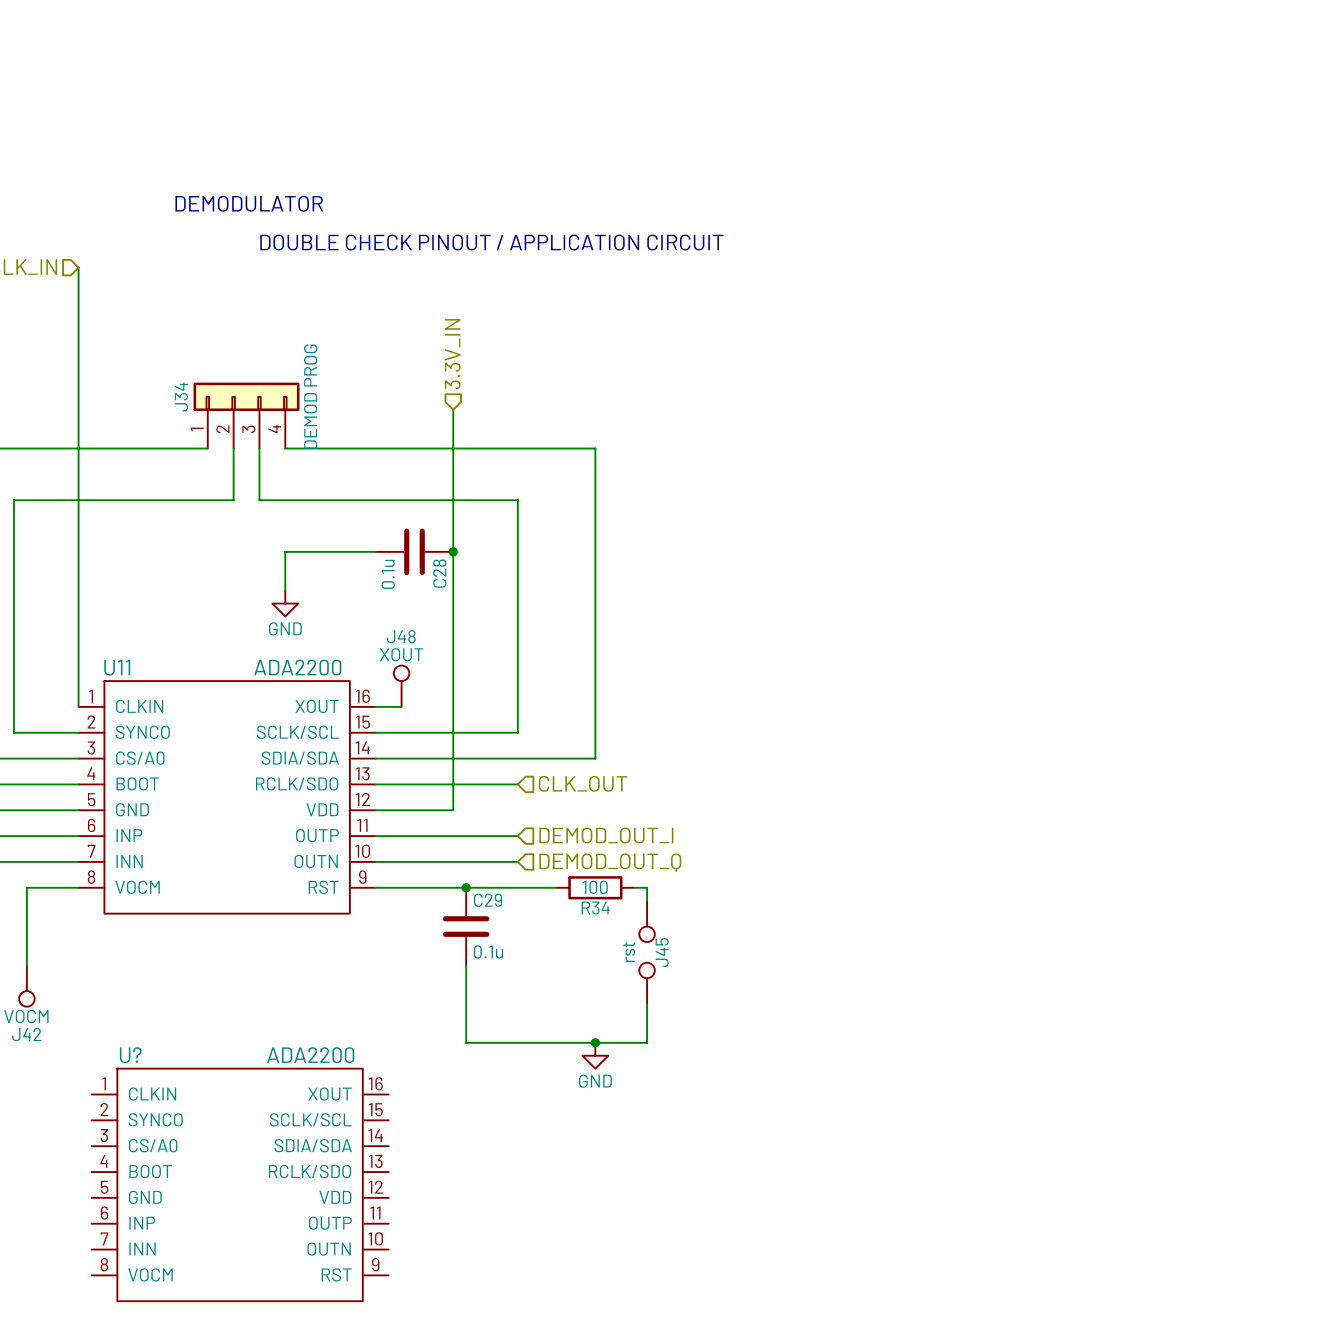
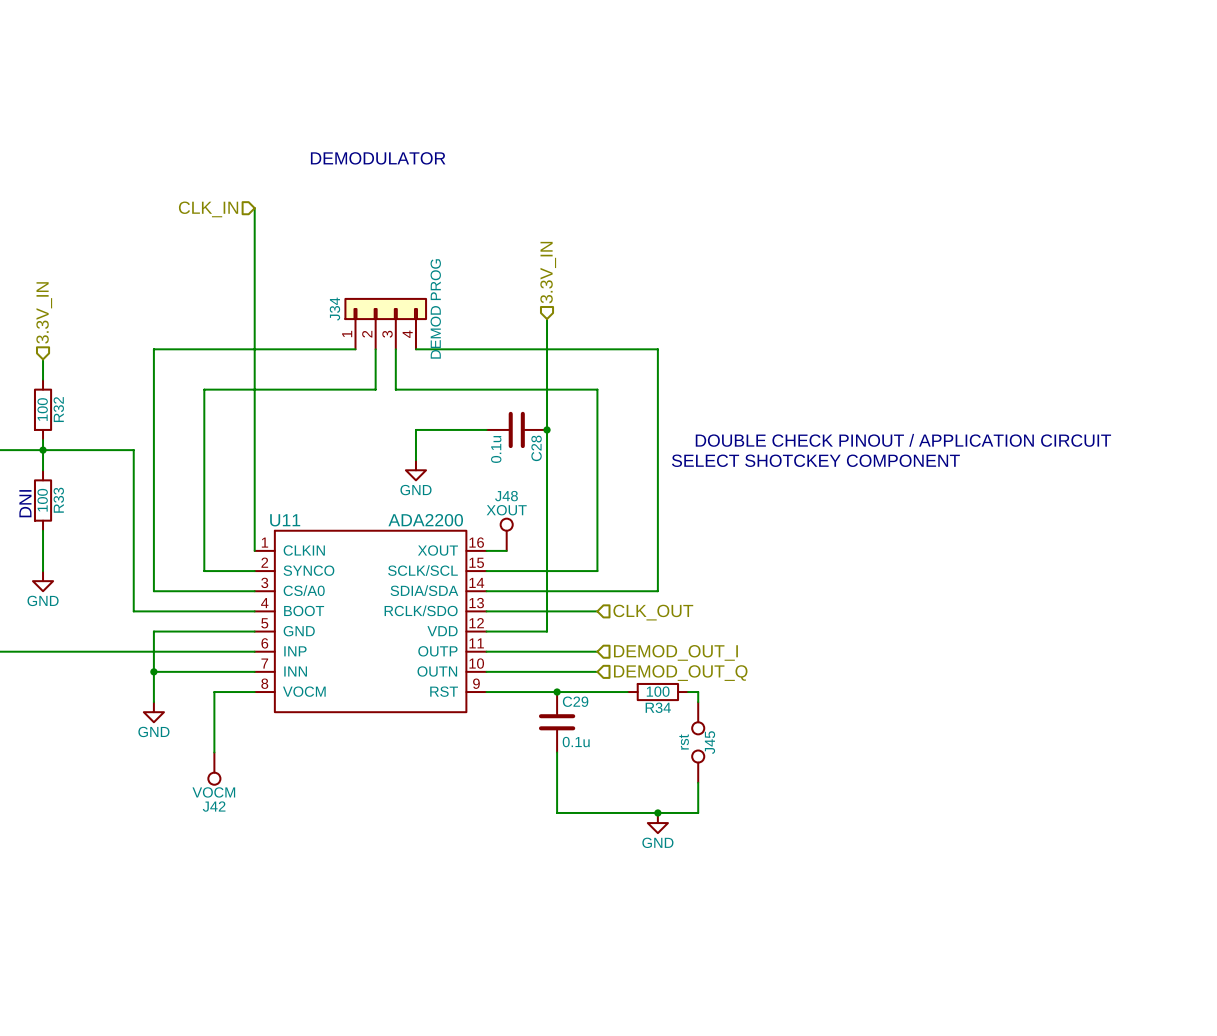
text: DOUBLE CHECK PINOUT / APPLICATION CIRCUIT (491, 242) -> none
text: none -> DOUBLE CHECK PINOUT / APPLICATION CIRCUIT (903, 440)
text: none -> SELECT SHOTCKEY COMPONENT (815, 460)
U?: ADA2200 (240, 1184) -> none

